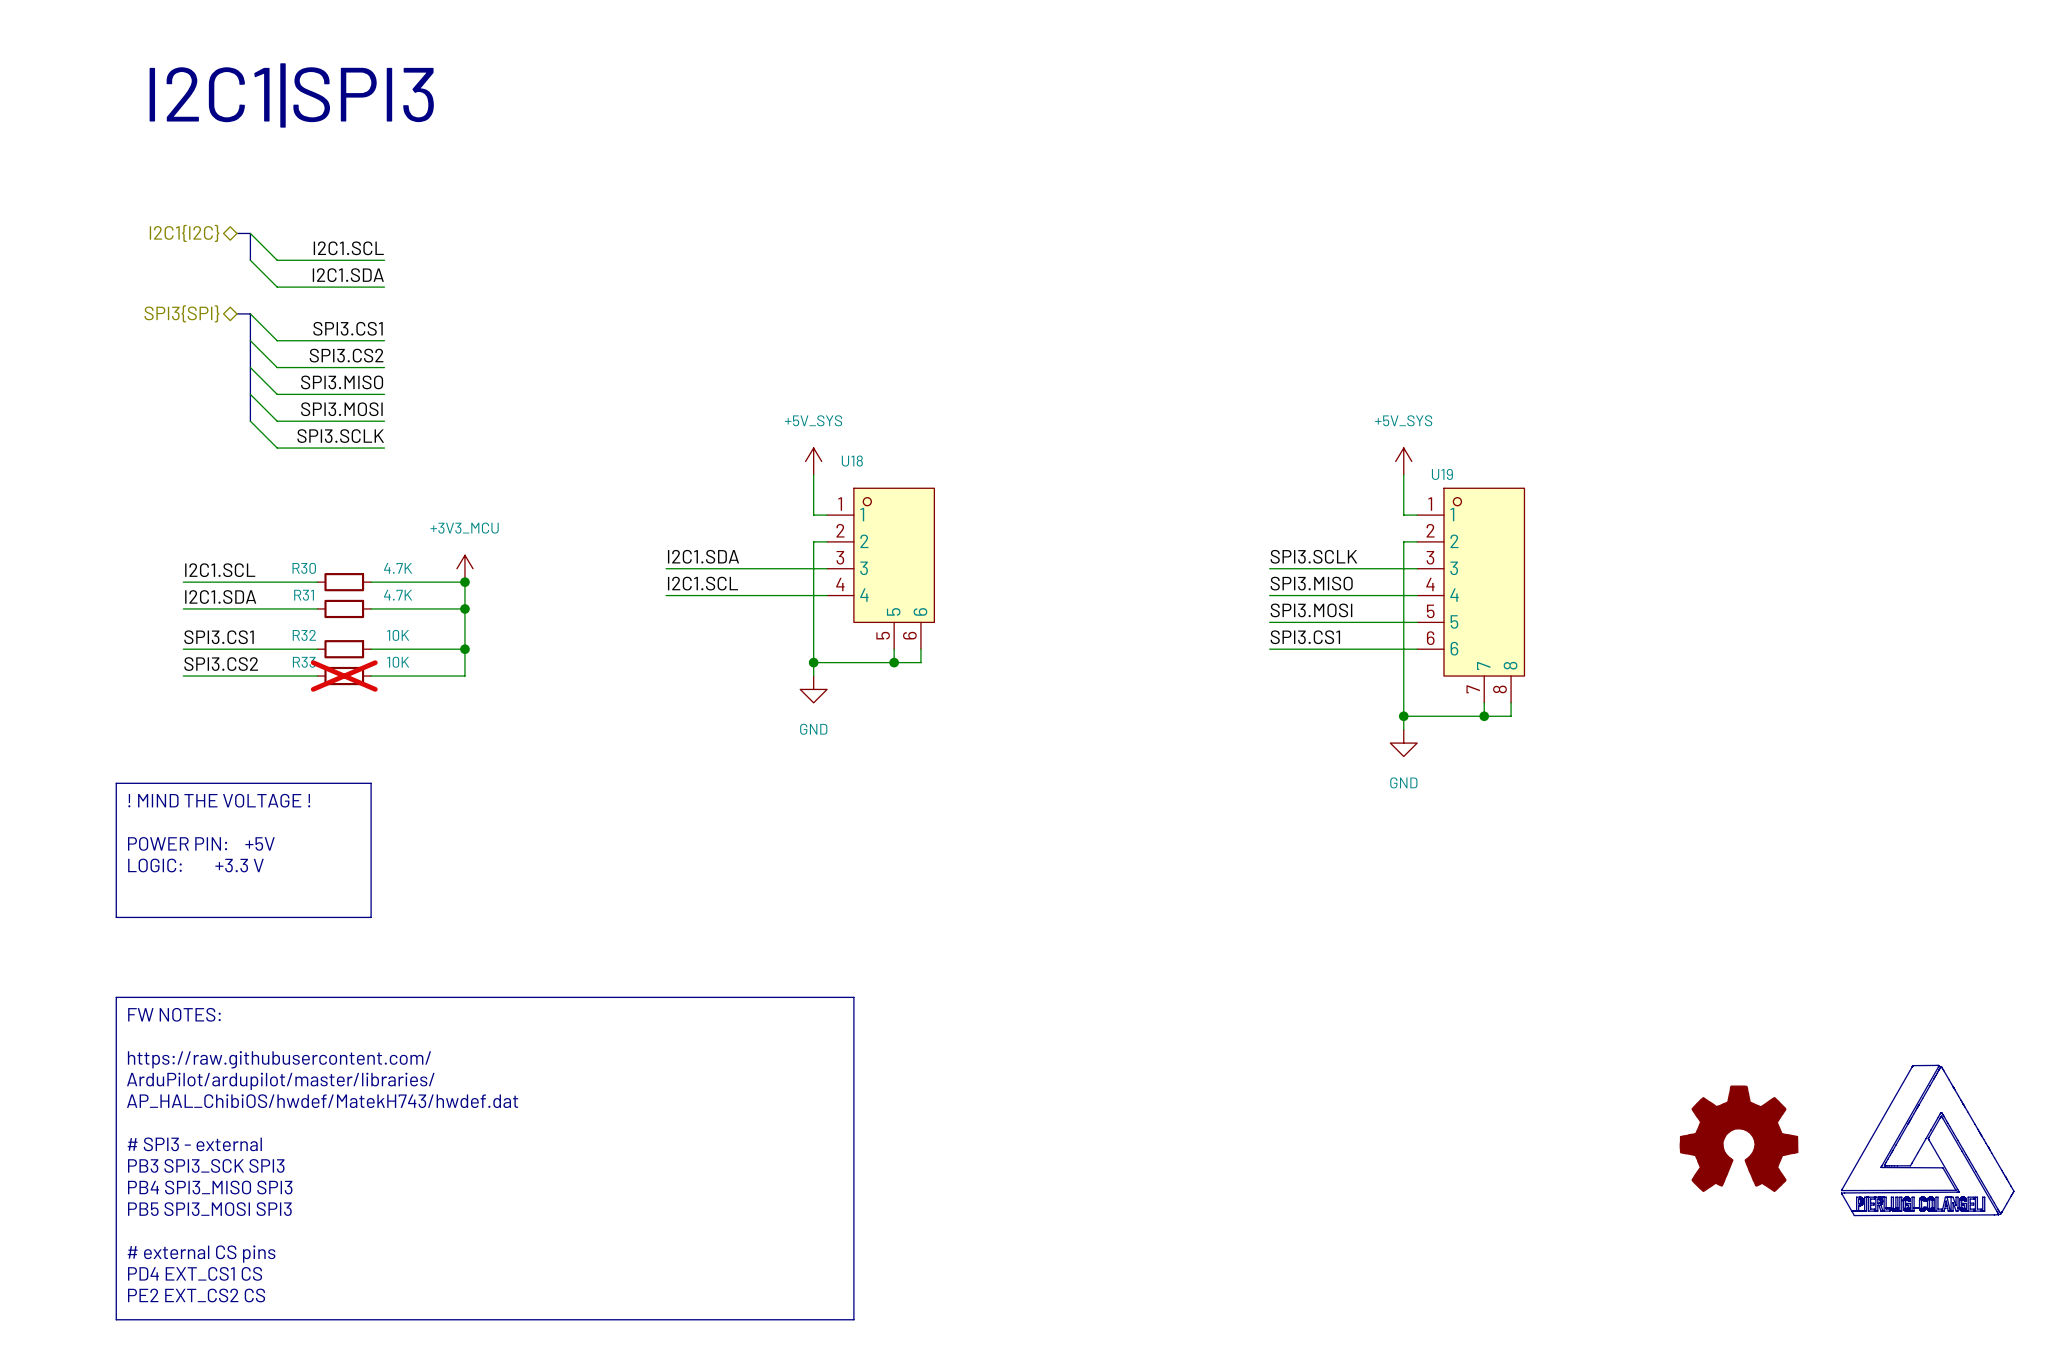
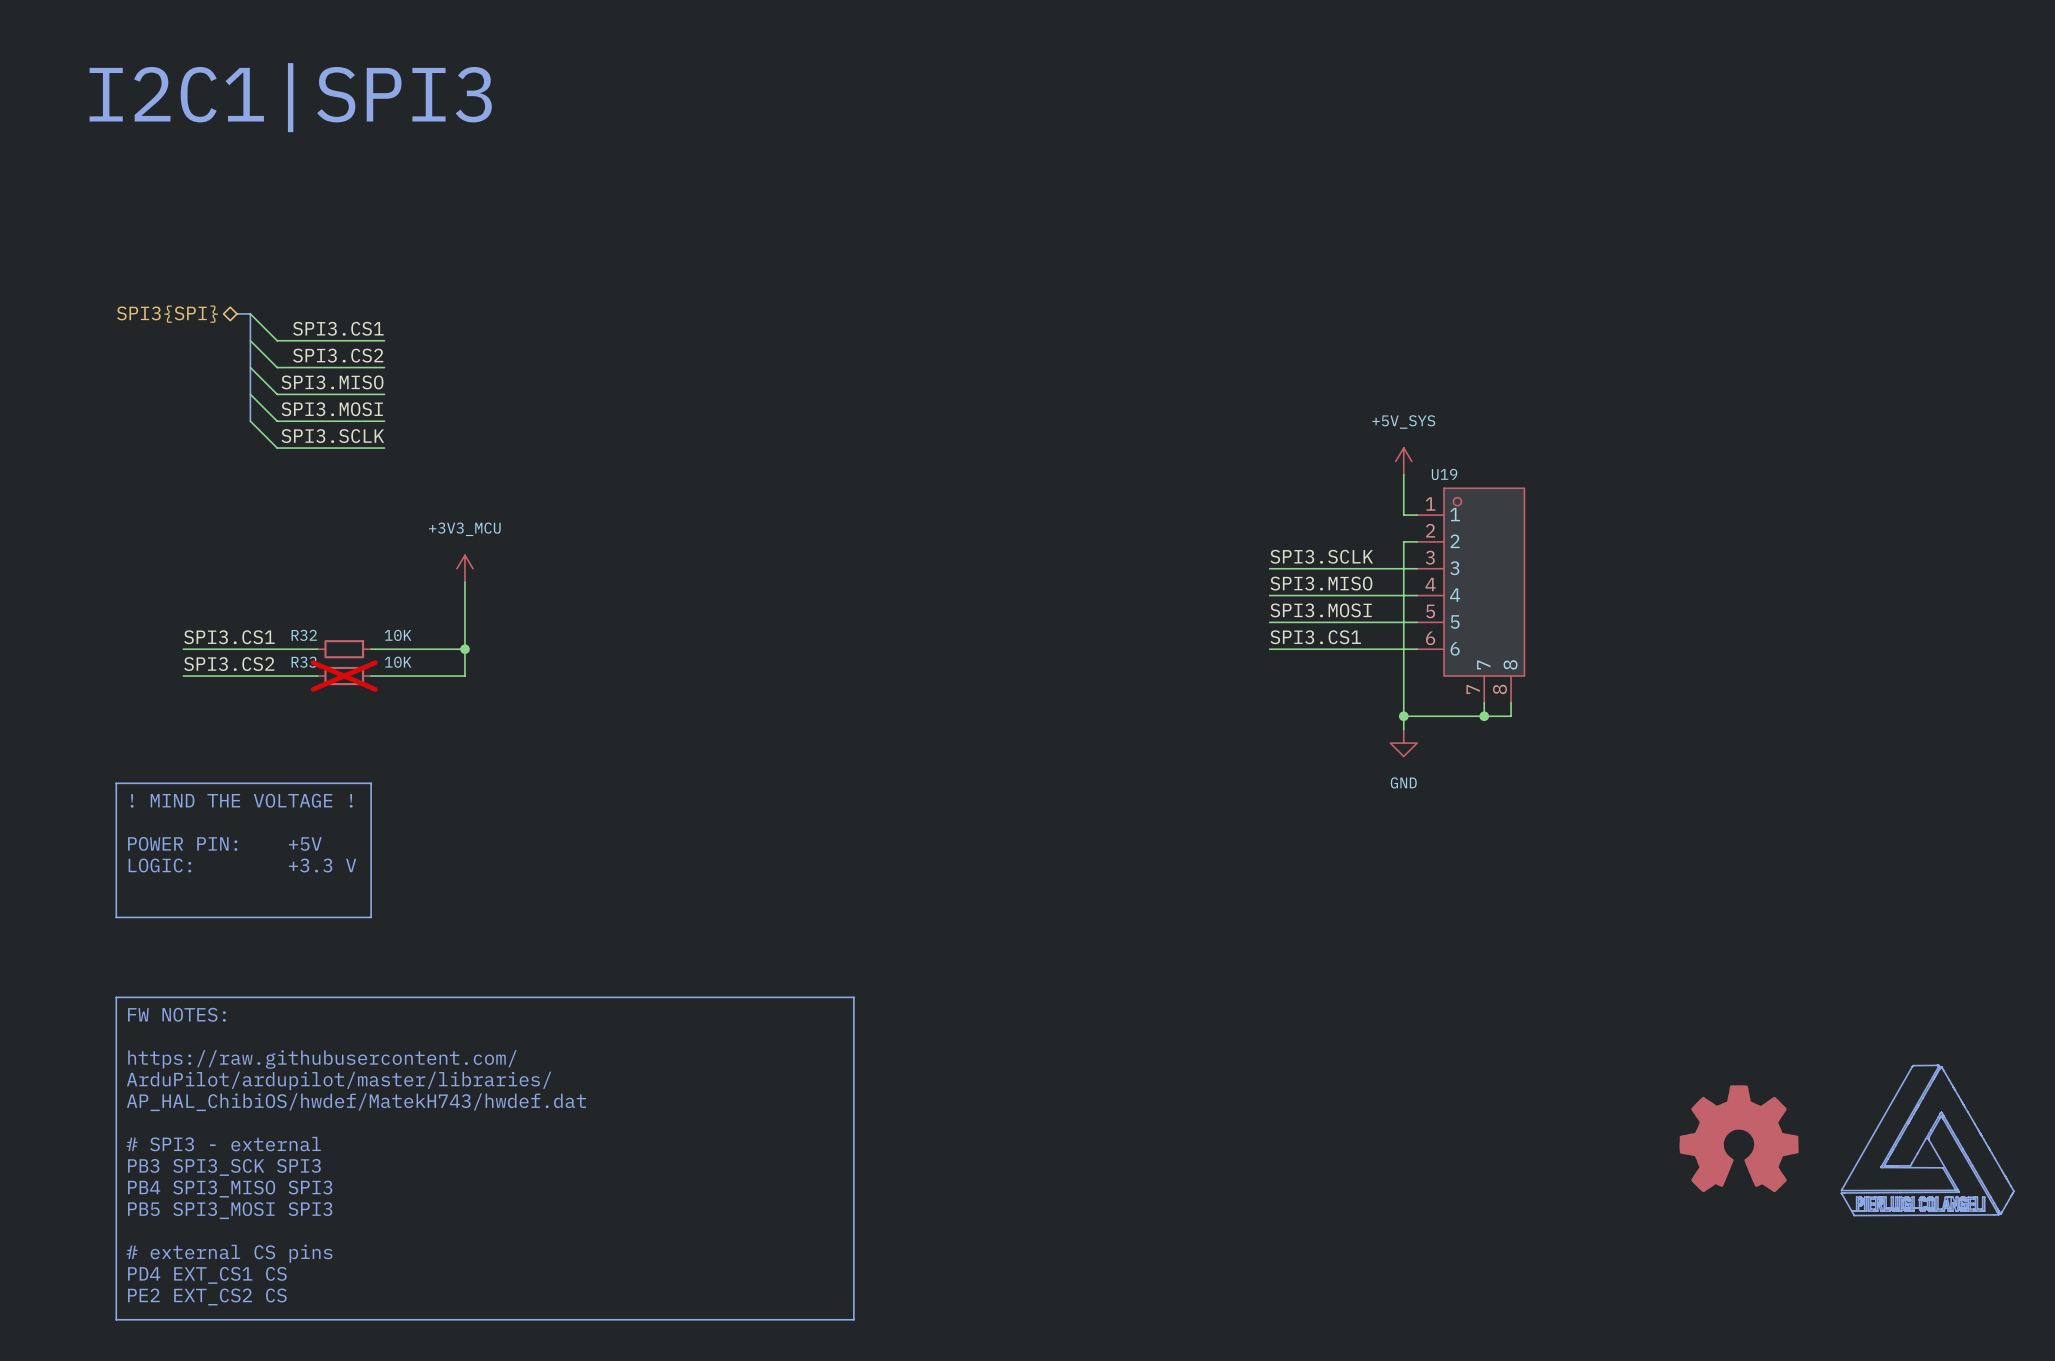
hierarchical label: I2C1{I2C} (184, 233) -> none
bus: (236, 233) (250, 233) (250, 260) -> none
wire: (250, 233) (277, 260) (384, 260) -> none
label: I2C1.SCL (348, 248) -> none
wire: (250, 260) (277, 287) (384, 287) -> none
label: I2C1.SDA (348, 275) -> none
power symbol: +5V_SYS (813, 461) -> none
wire: (813, 474) (813, 515) (827, 515) -> none
wire: (827, 541) (813, 541) (813, 676) -> none
label: I2C1.SDA (703, 556) -> none
wire: (666, 568) (827, 568) -> none
U18: (880, 568) -> none
label: I2C1.SCL (220, 570) -> none
wire: (183, 582) (317, 582) -> none
R30: 4.7K (344, 582) -> none
wire: (371, 582) (464, 582) -> none
junction: (464, 582) -> none
label: I2C1.SCL (702, 583) -> none
wire: (666, 595) (827, 595) -> none
label: I2C1.SDA (220, 597) -> none
wire: (183, 608) (317, 608) -> none
R31: 4.7K (344, 608) -> none
wire: (371, 608) (464, 608) -> none
junction: (464, 608) -> none
wire: (894, 649) (894, 662) -> none
wire: (920, 649) (920, 662) (813, 662) -> none
junction: (813, 662) -> none
junction: (894, 662) -> none
power symbol: GND (813, 689) -> none

